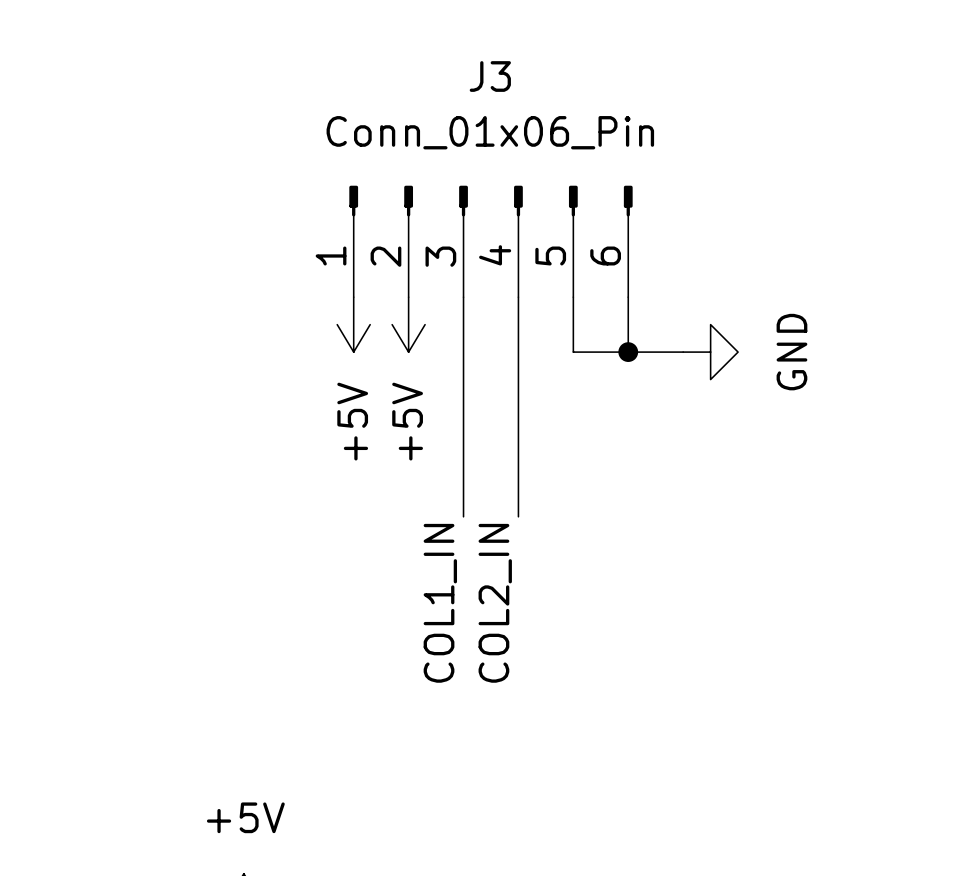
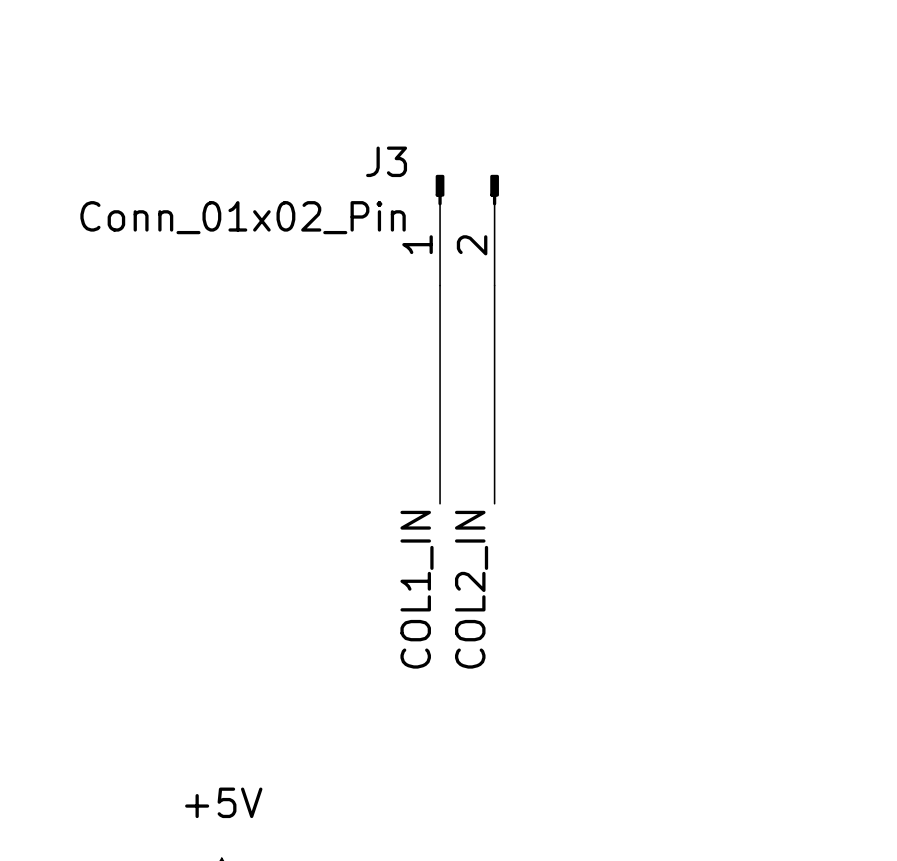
J3 name position: J3 (490, 76) -> J3 (386, 161)
J3 value: Conn_01x06_Pin (490, 132) -> Conn_01x02_Pin (243, 217)
J3 symbol: [349, 185, 633, 298] -> [435, 174, 499, 286]
wire: (573, 297) (573, 352) (683, 352) -> none
wire: (628, 297) (628, 352) -> none
power symbol: +5V (353, 324) -> none
power symbol: +5V (408, 324) -> none
junction: (628, 352) -> none
power symbol: GND (710, 352) -> none

